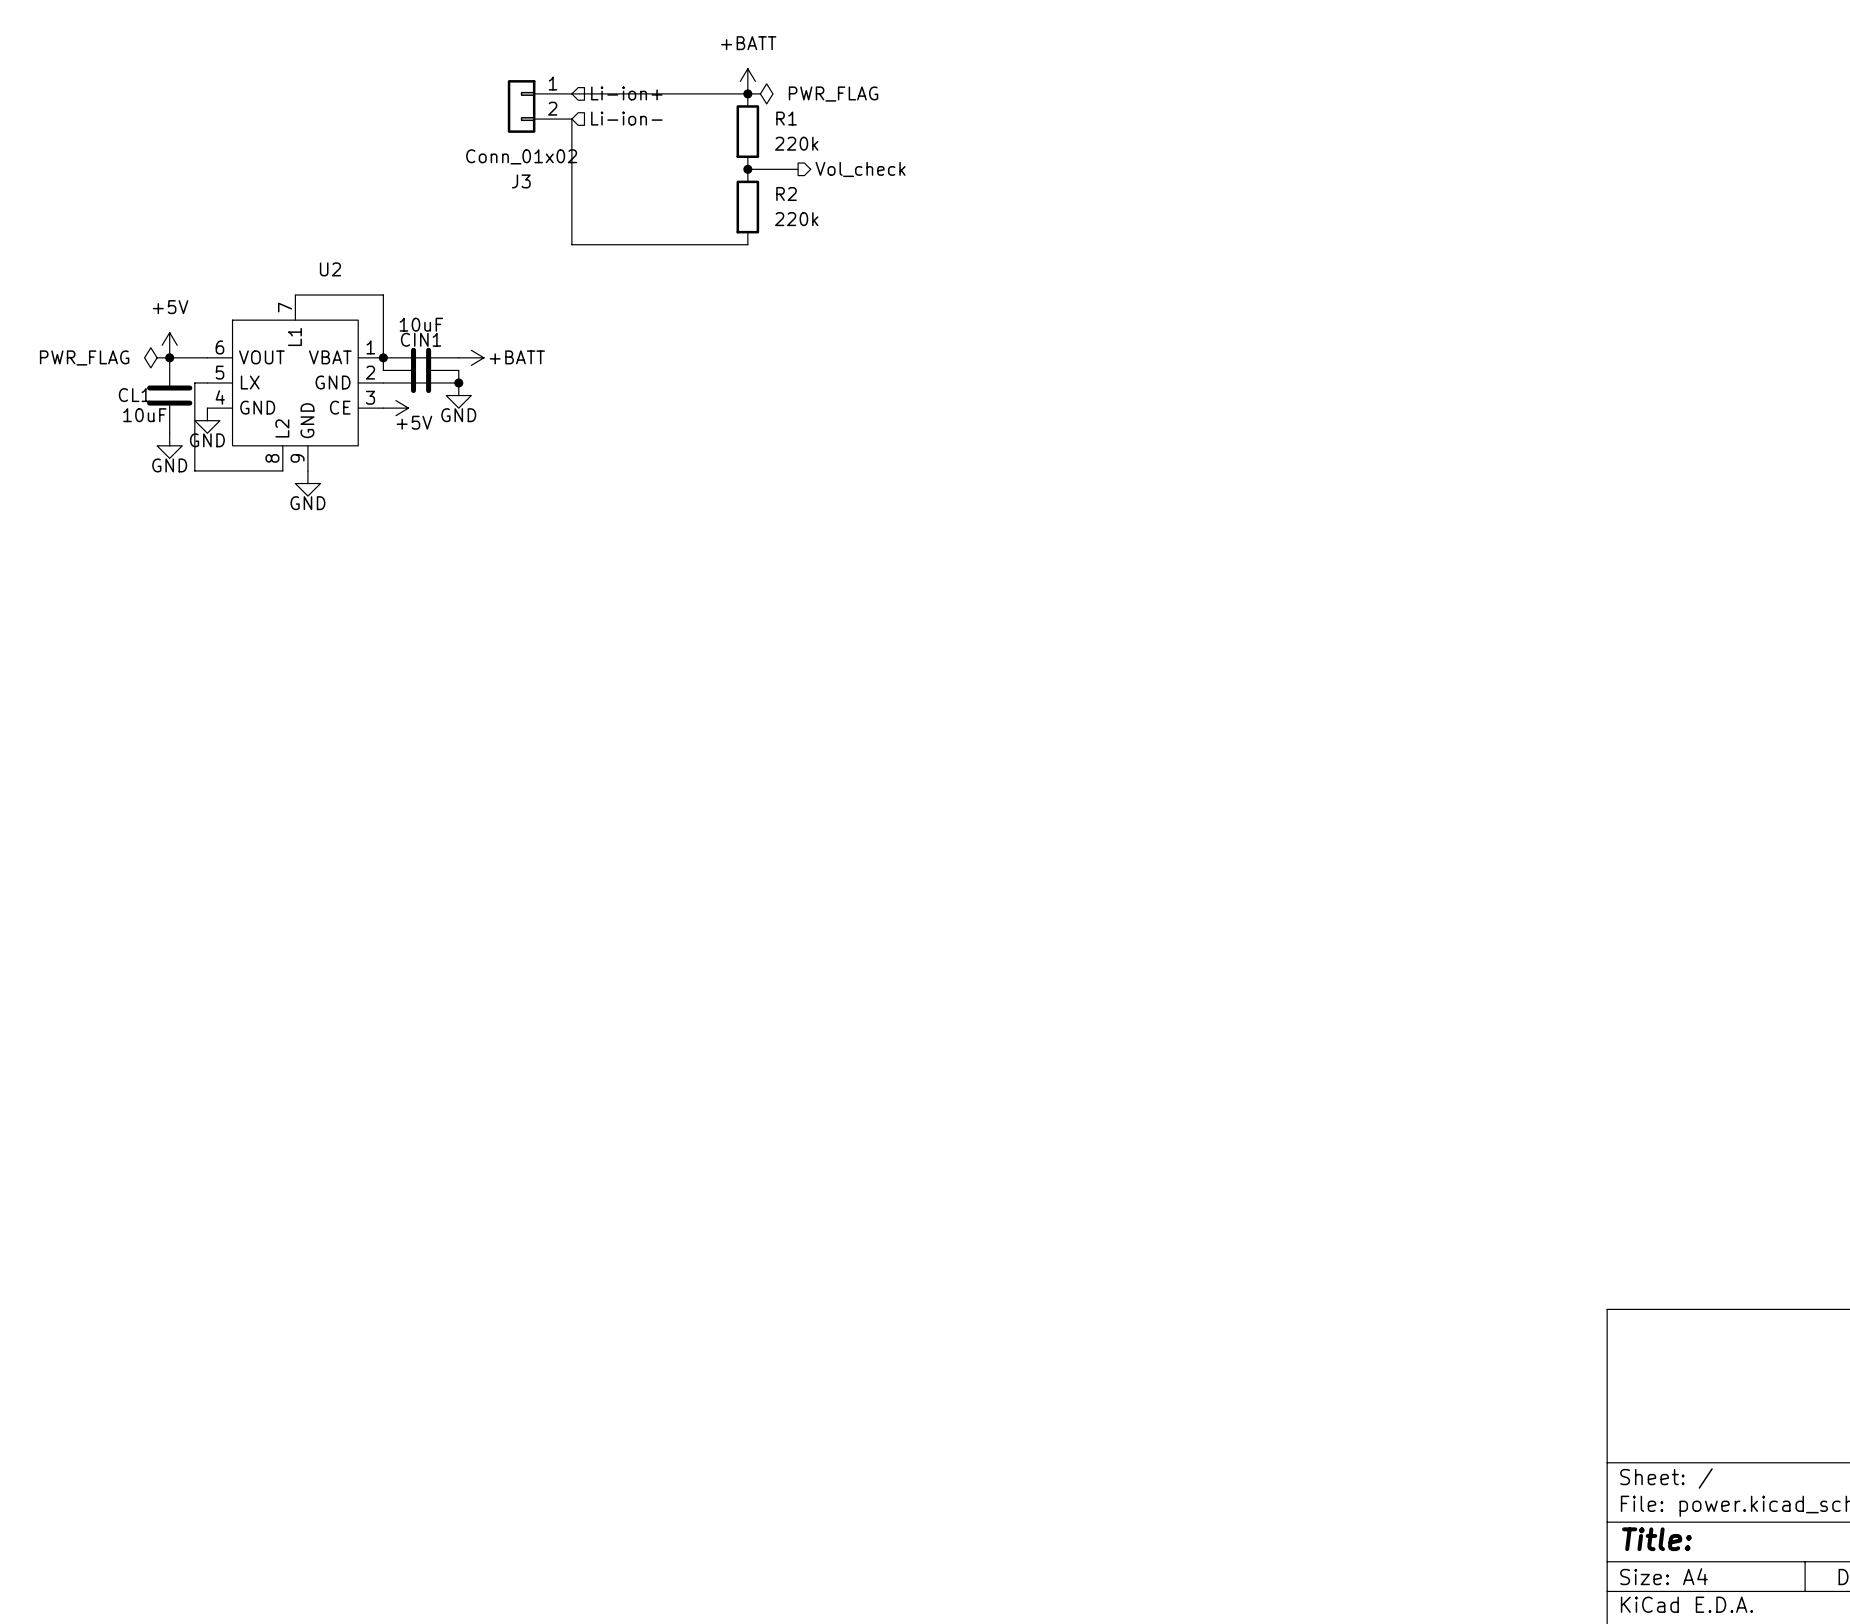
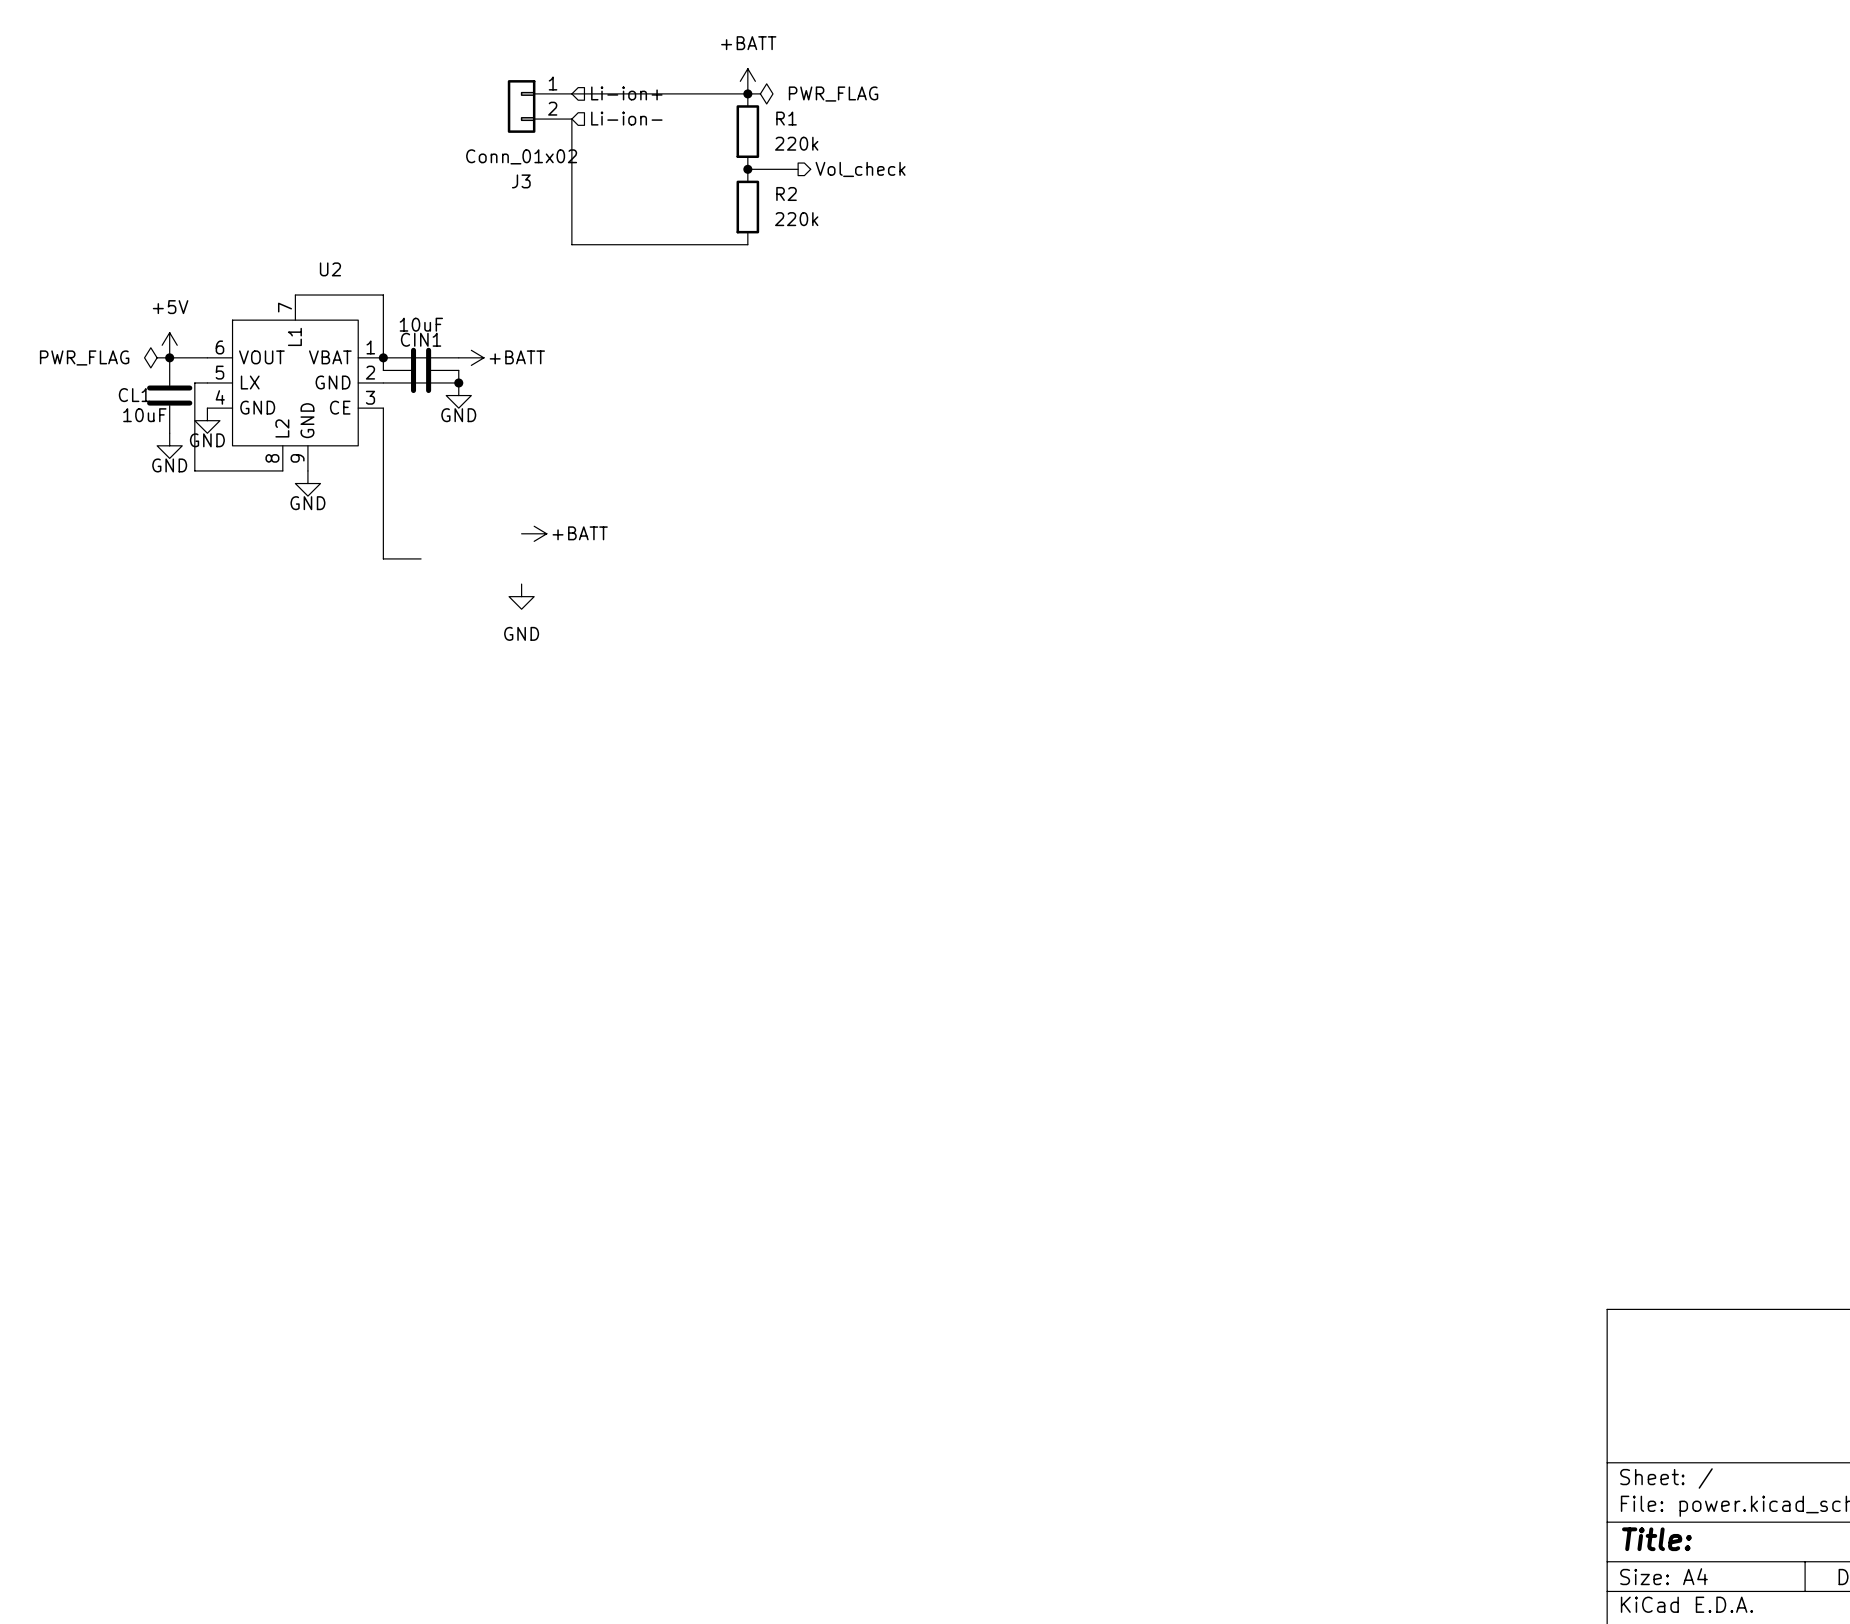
wire: none -> (383, 408) (383, 558) (421, 558)
power symbol: +5V (395, 408) -> none
power symbol: none -> +BATT (534, 533)
power symbol: none -> GND (521, 596)

